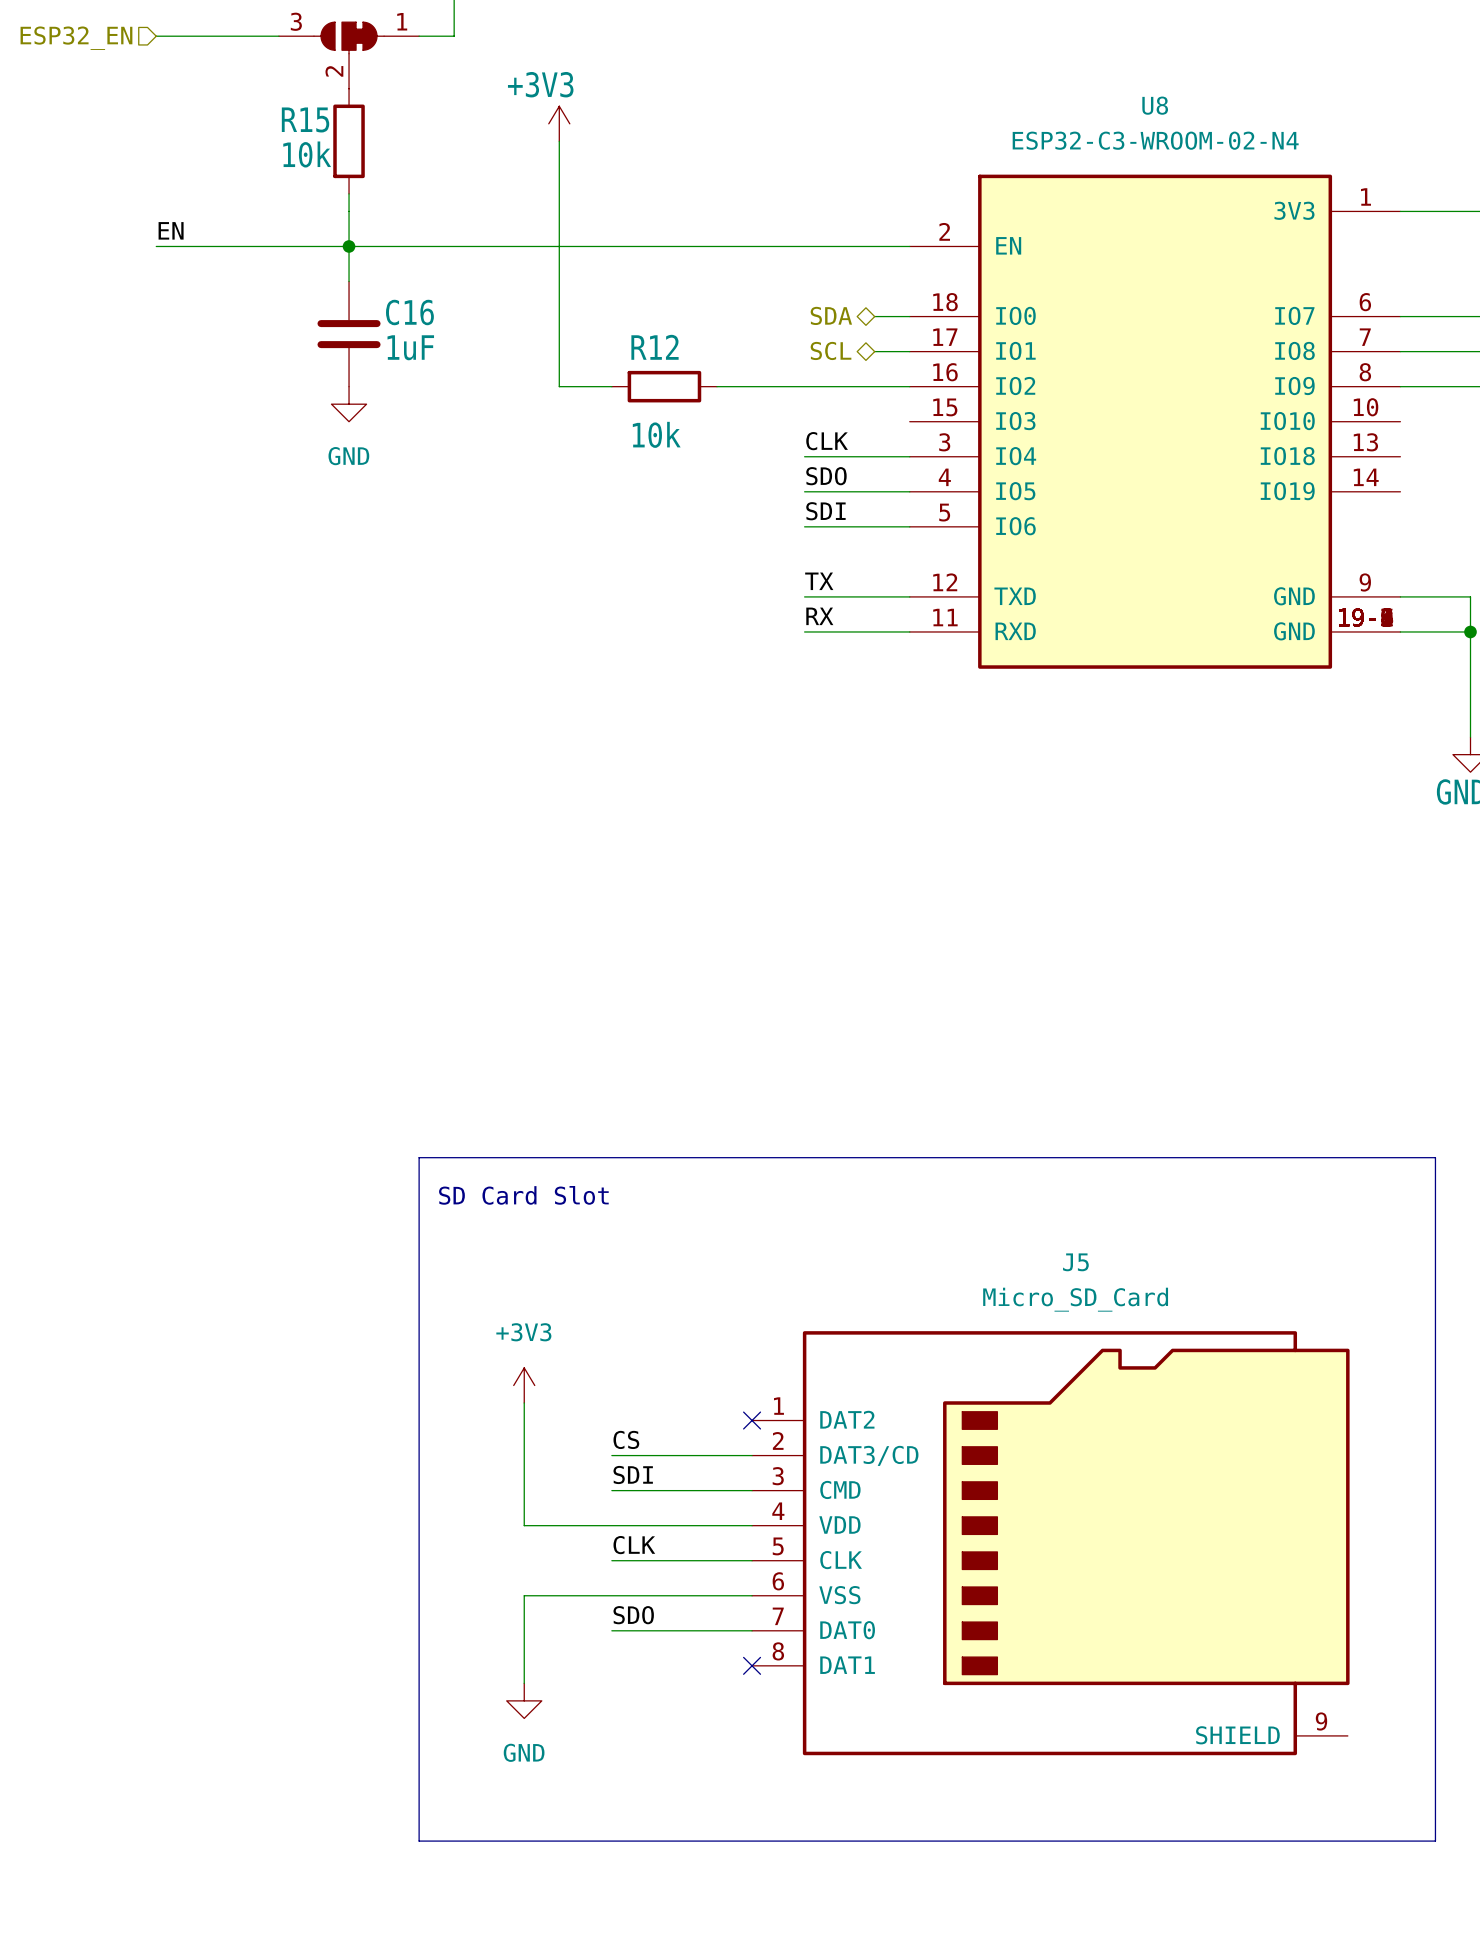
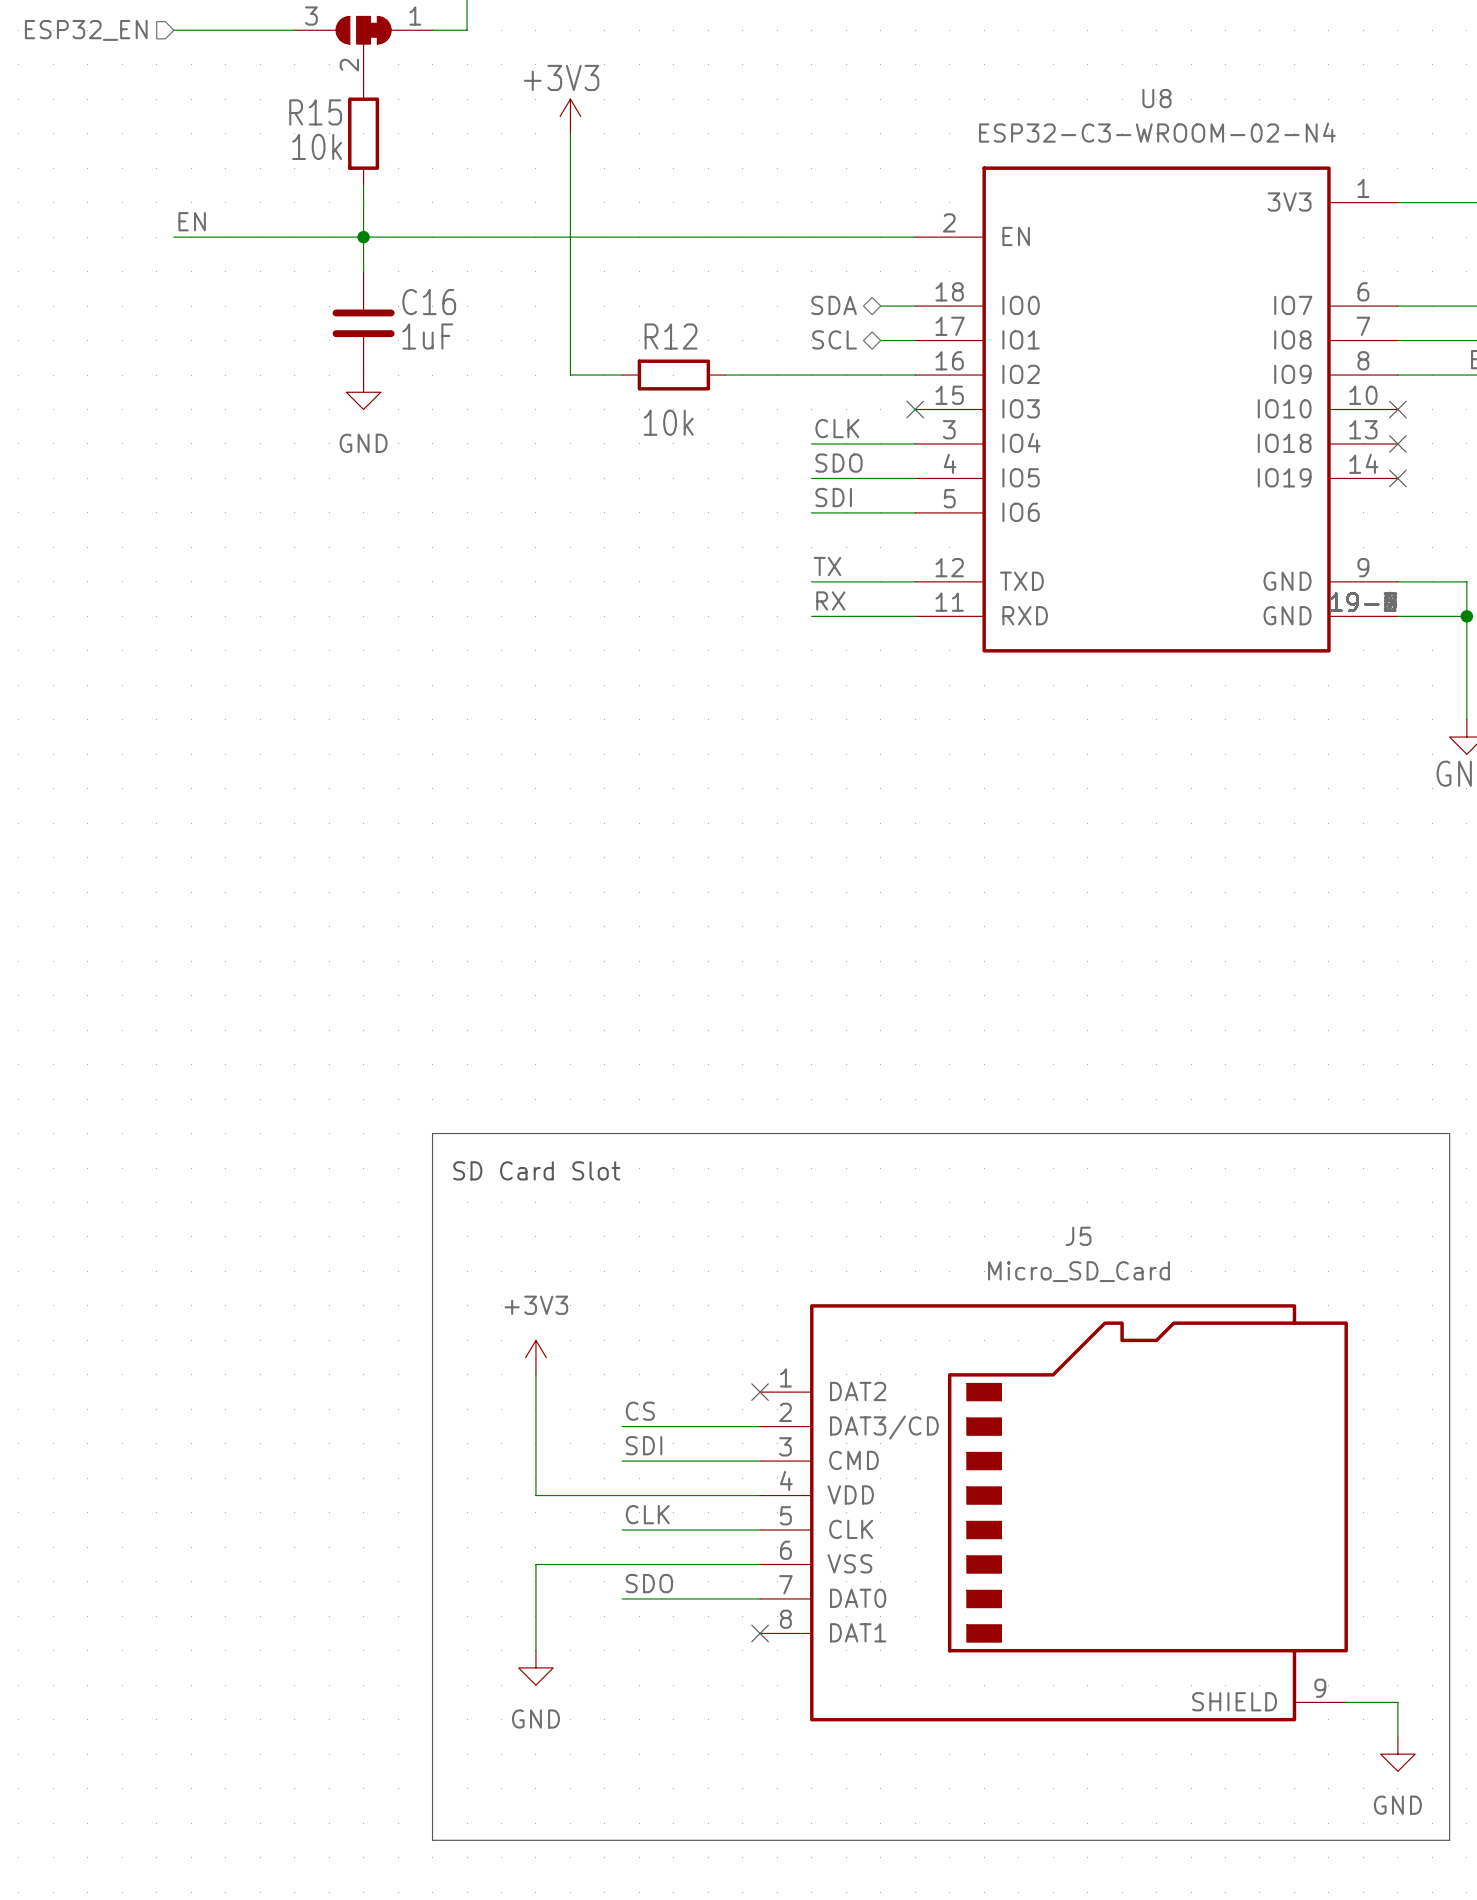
no-connect mark: none -> (915, 409)
no-connect mark: none -> (1397, 409)
no-connect mark: none -> (1397, 443)
no-connect mark: none -> (1397, 478)
line: (1435, 1157) (1435, 1841) (419, 1841) -> (1432, 1133) (1449, 1133) (1449, 1840) (432, 1840) (432, 1805)
wire: none -> (1346, 1702) (1397, 1702) (1397, 1736)
power symbol: none -> GND (1397, 1754)

